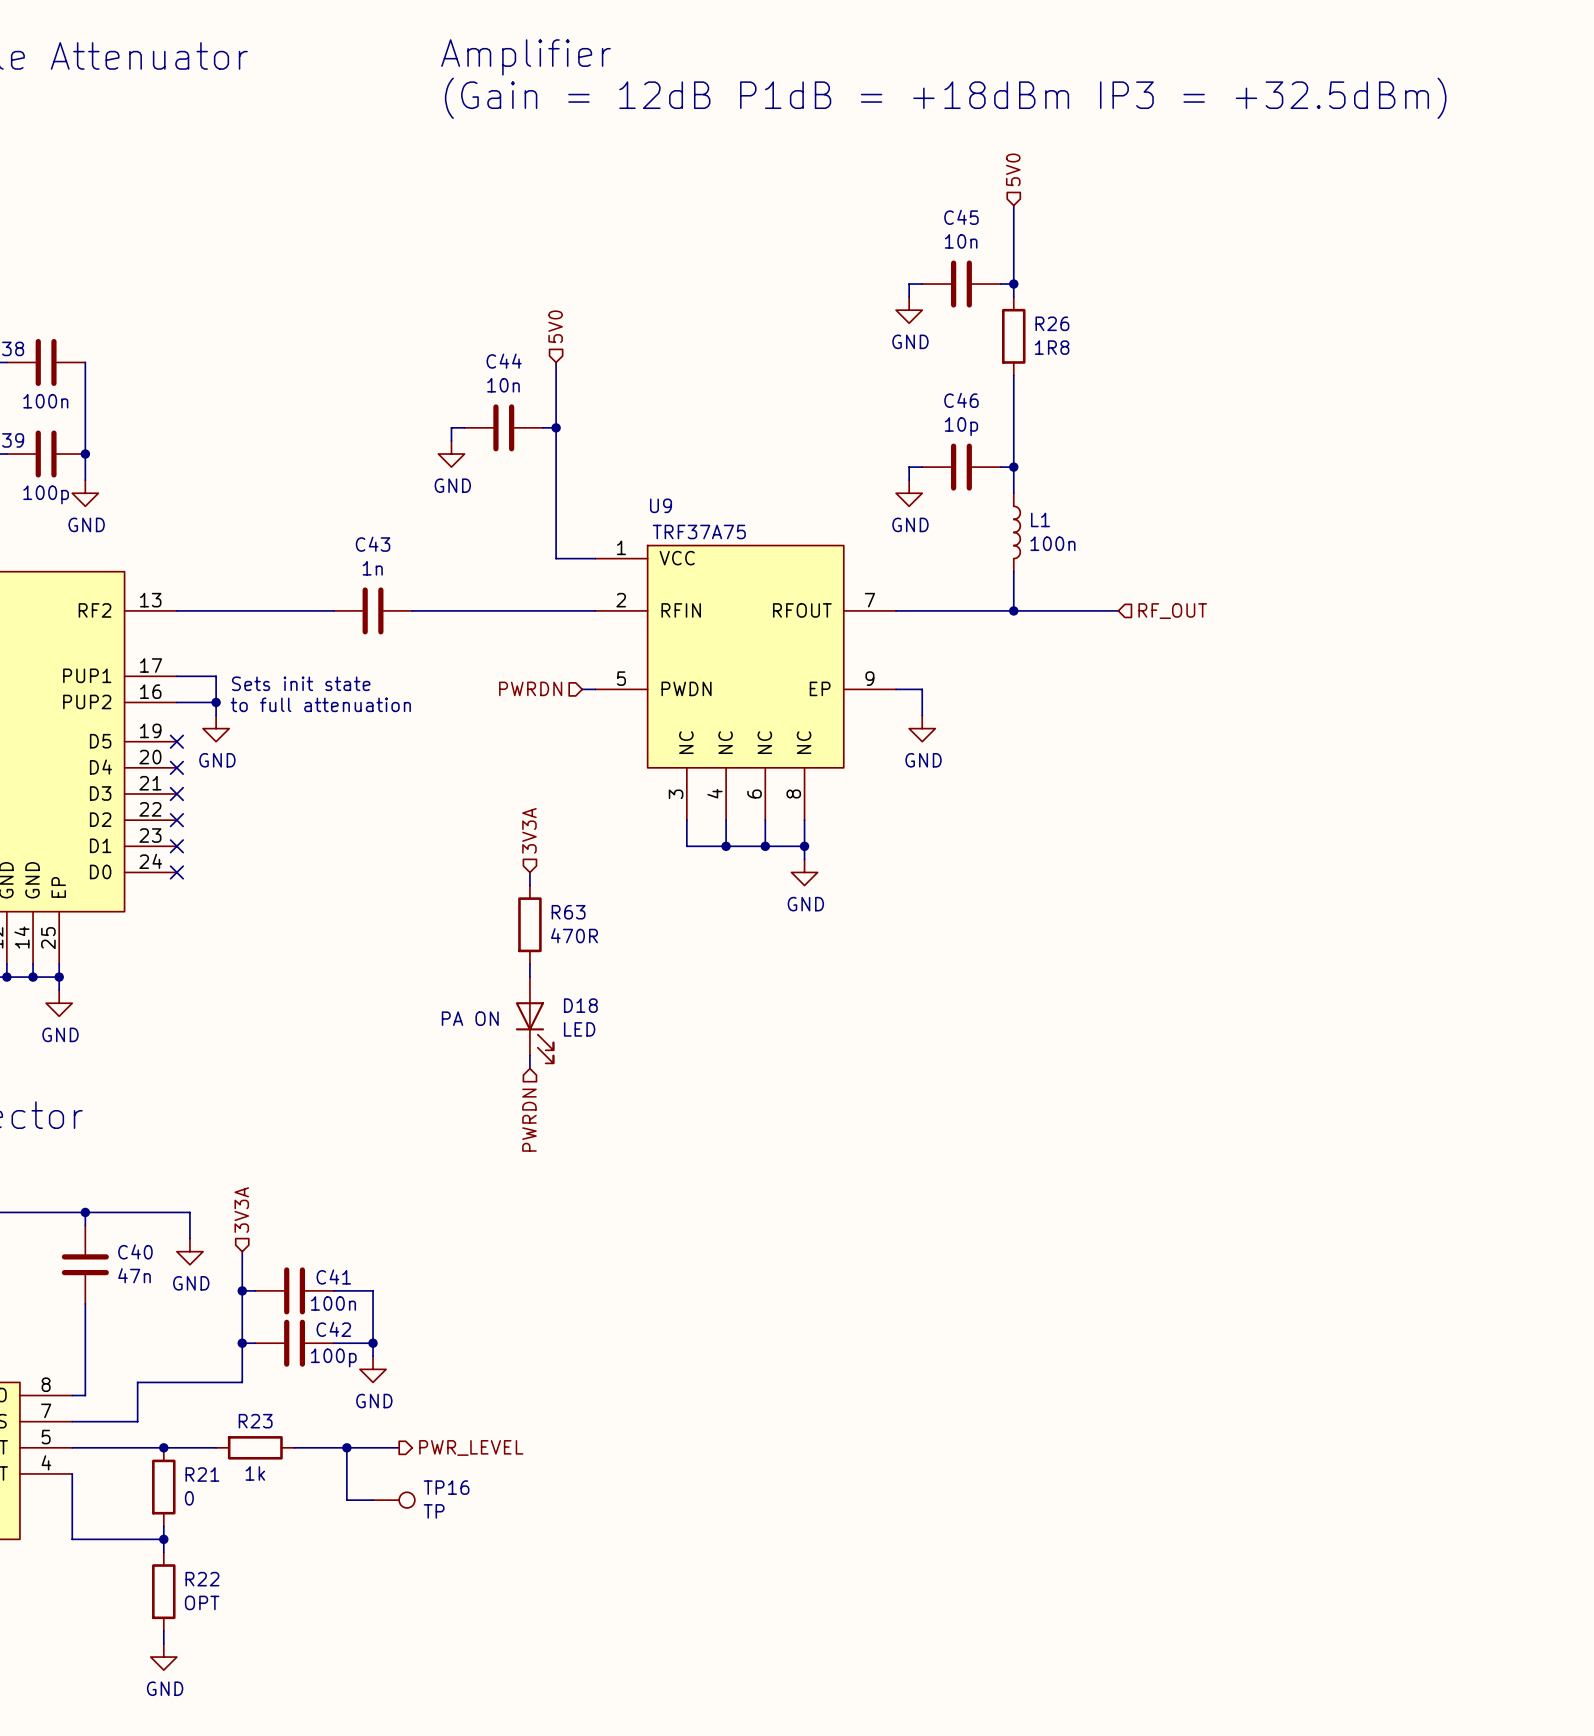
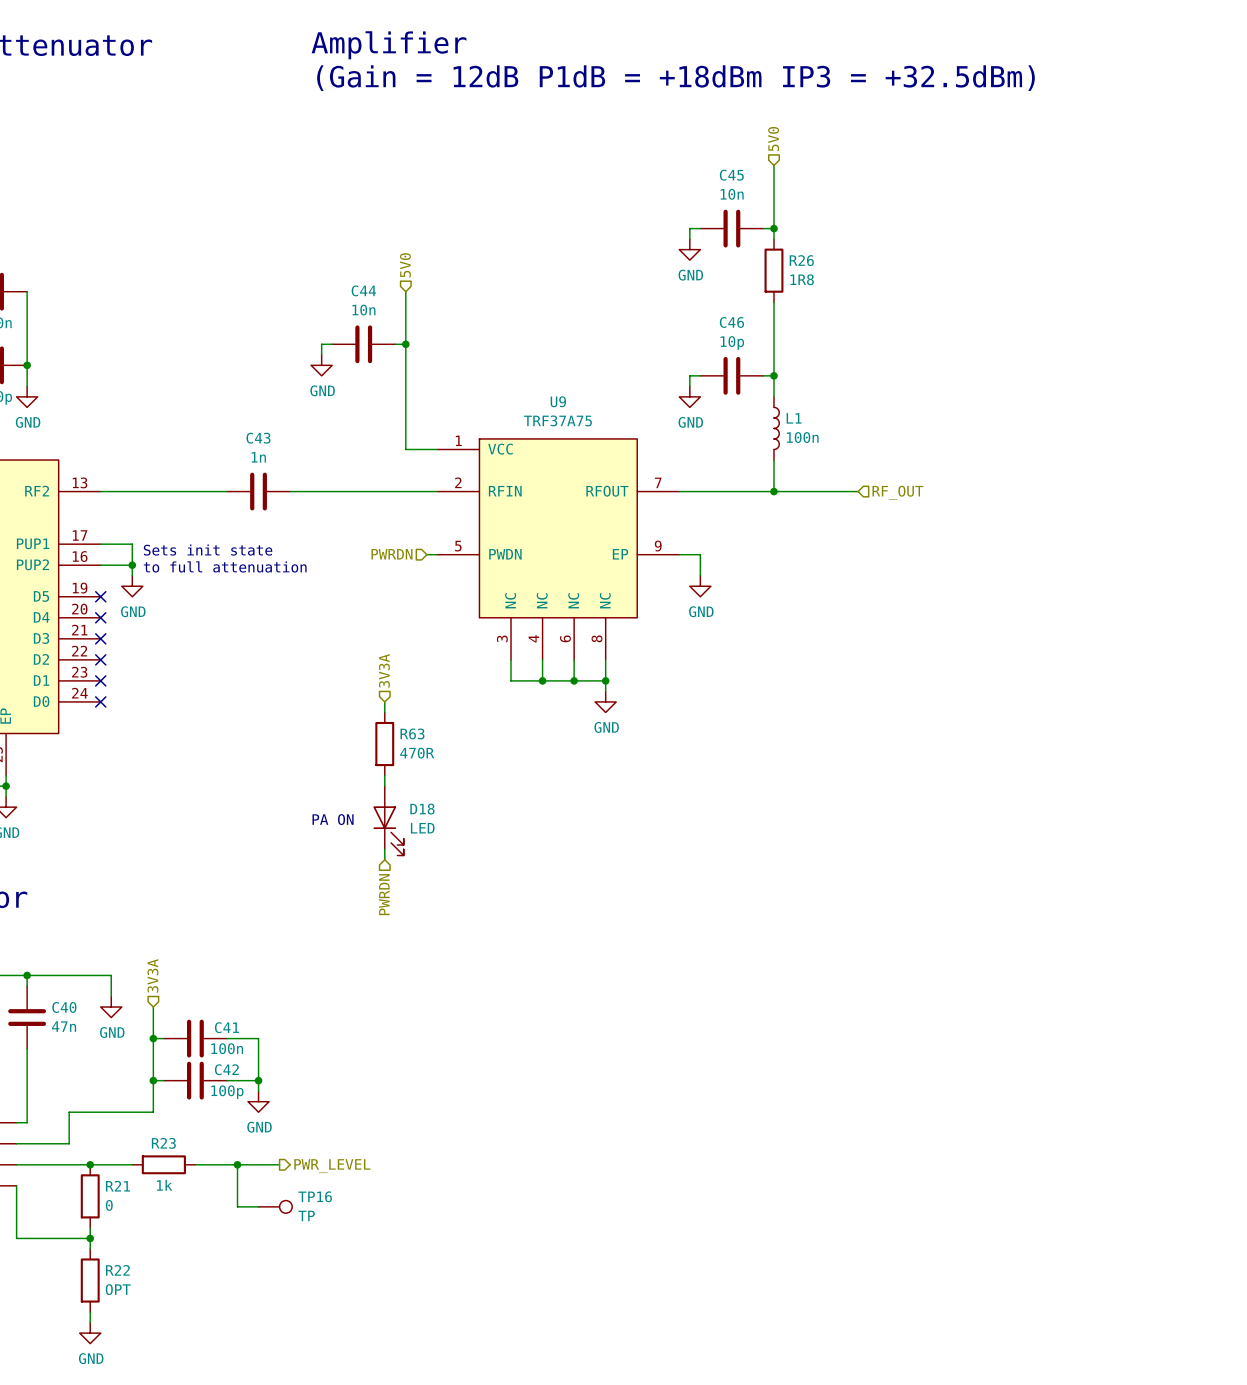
U9 name position: U9 (661, 505) -> U9 (558, 401)
U9 value position: TRF37A75 (699, 531) -> TRF37A75 (557, 420)

